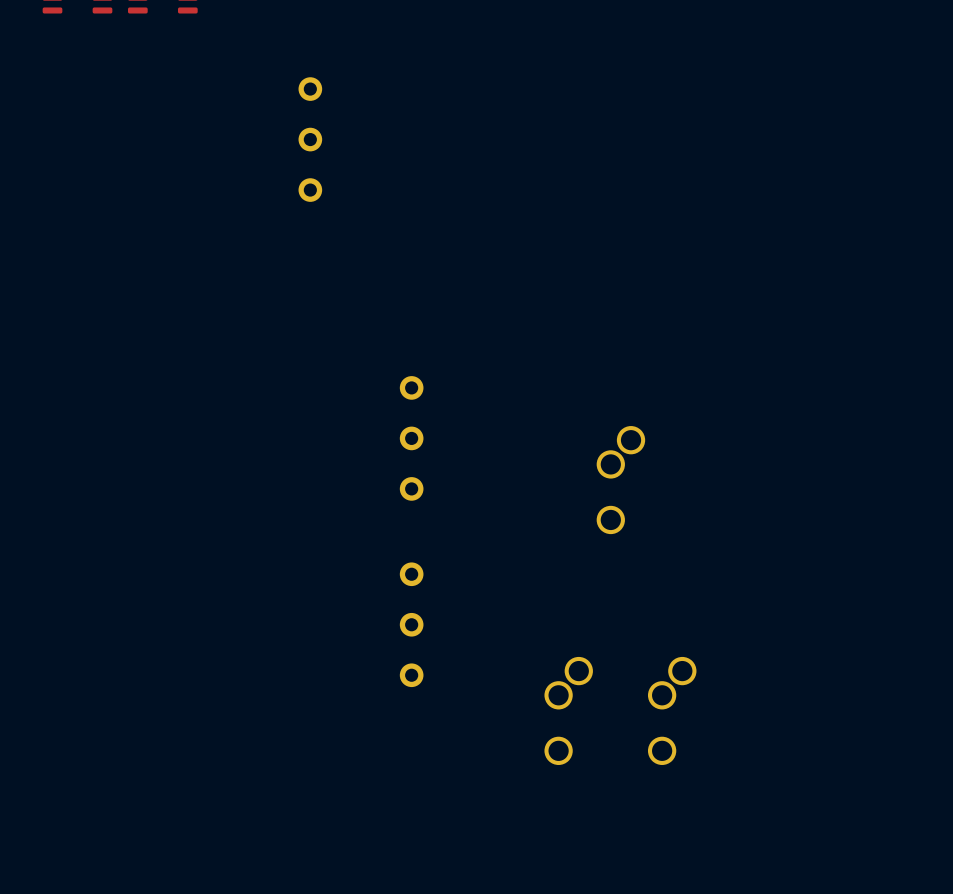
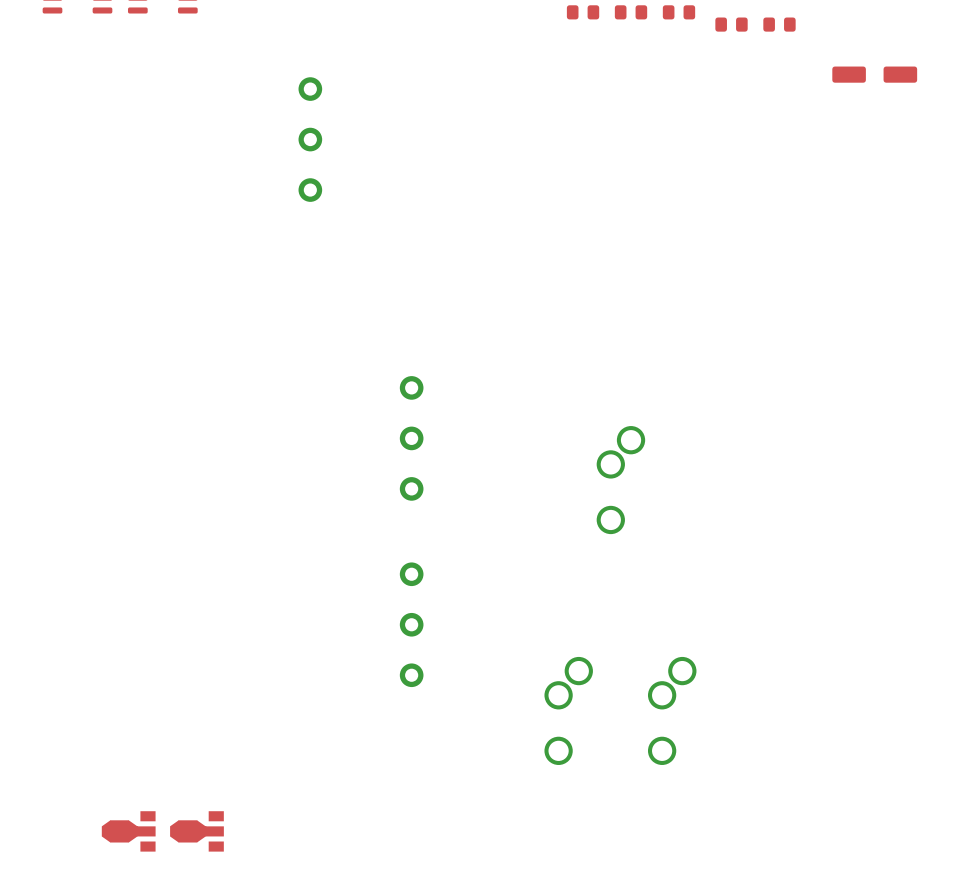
part: none -> (583, 12)
part: none -> (631, 12)
part: none -> (678, 12)
part: none -> (731, 24)
part: none -> (779, 24)
part: none -> (874, 74)
part: none -> (128, 831)
part: none -> (196, 831)

